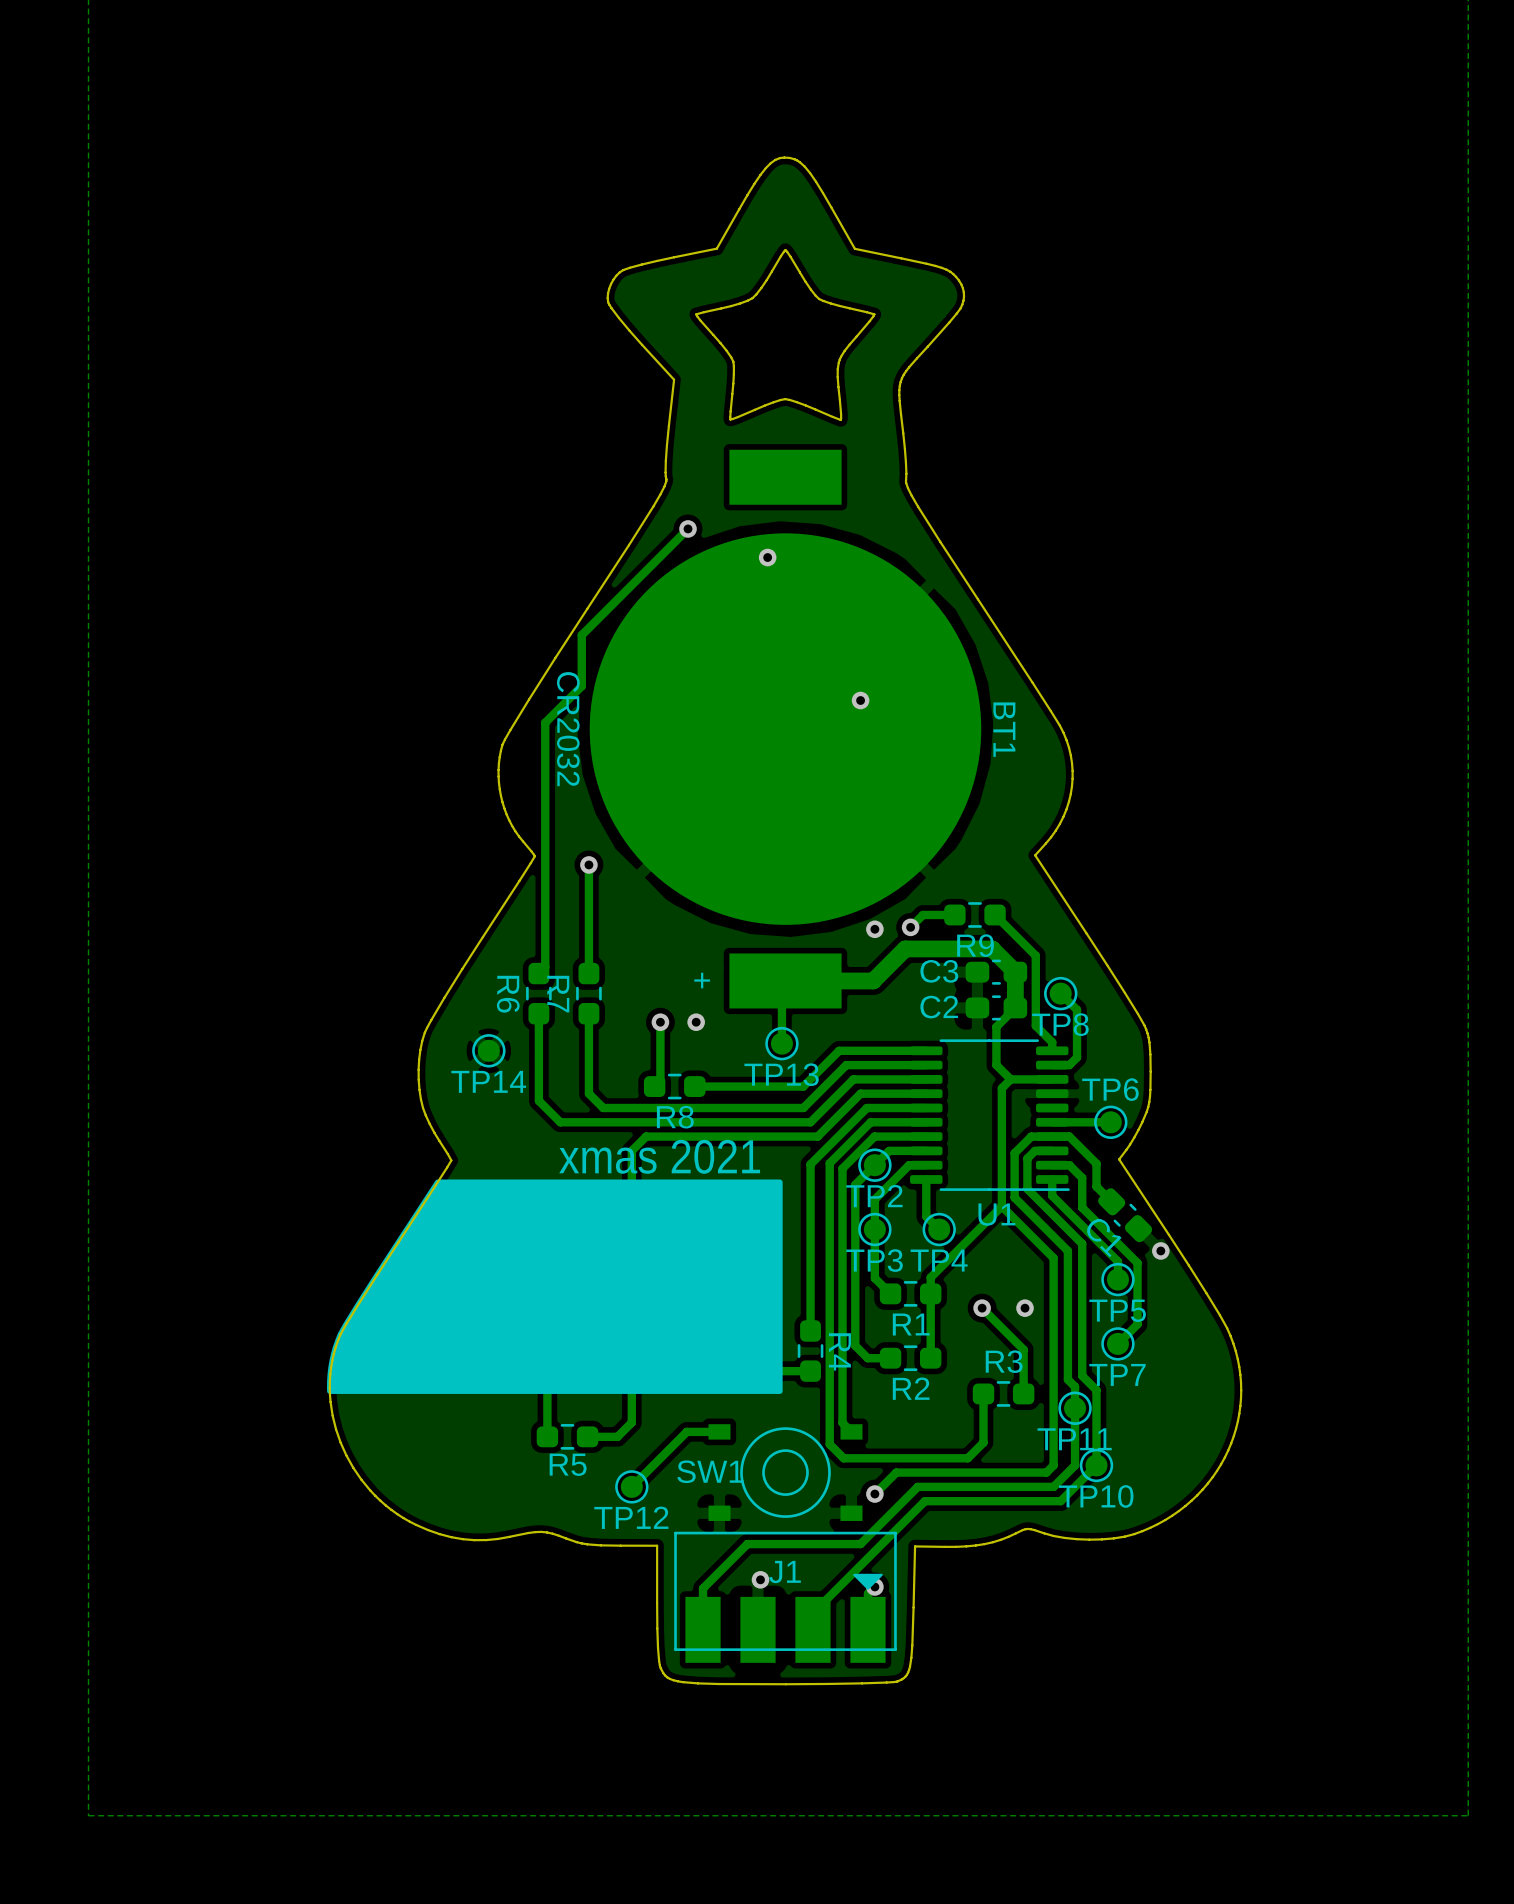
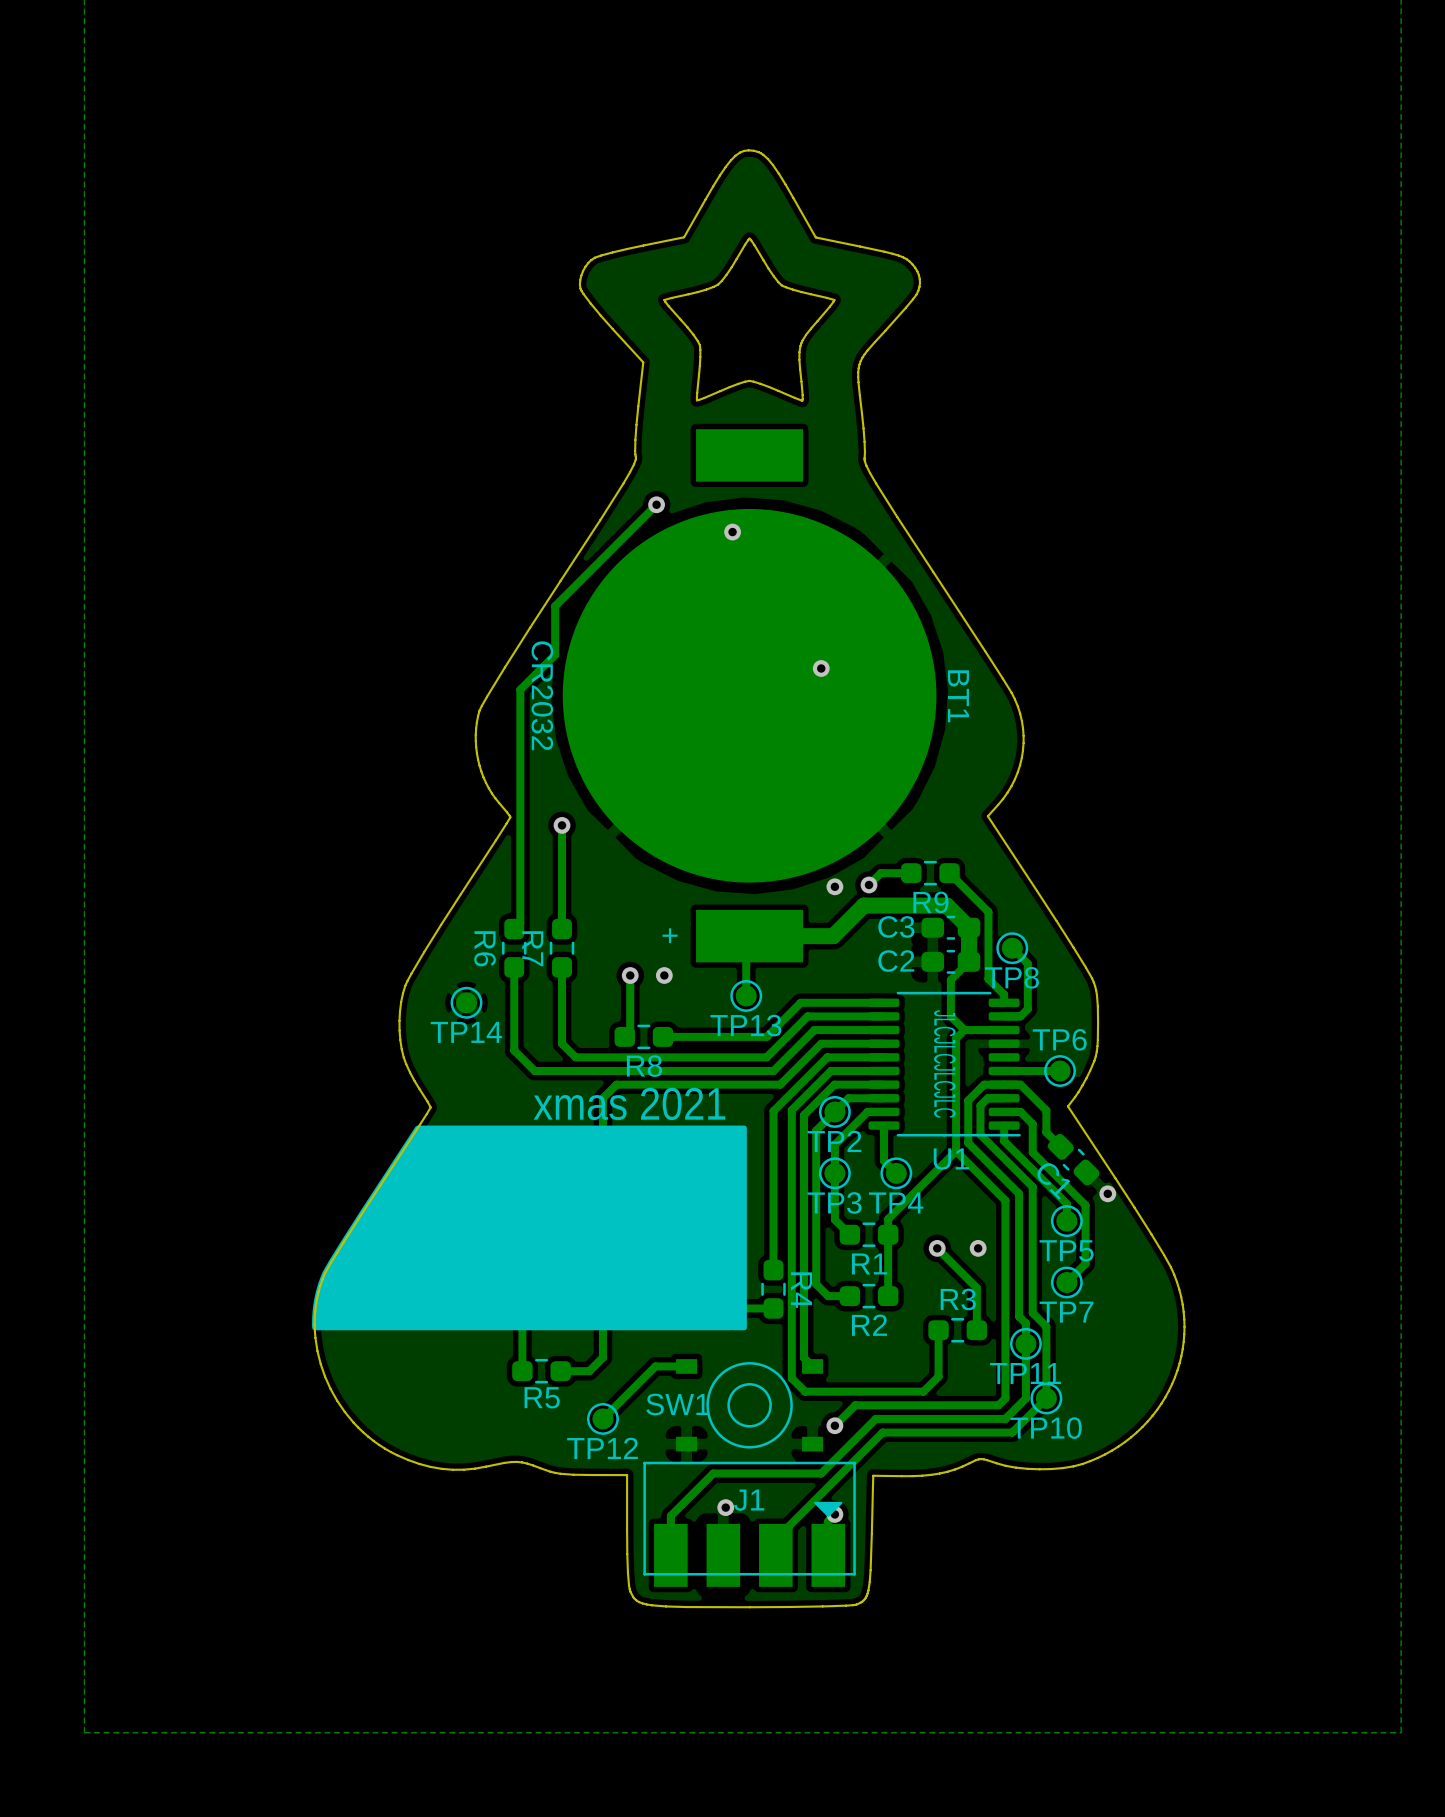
text: none -> JLCJLCJLCJLC (944, 1064)

